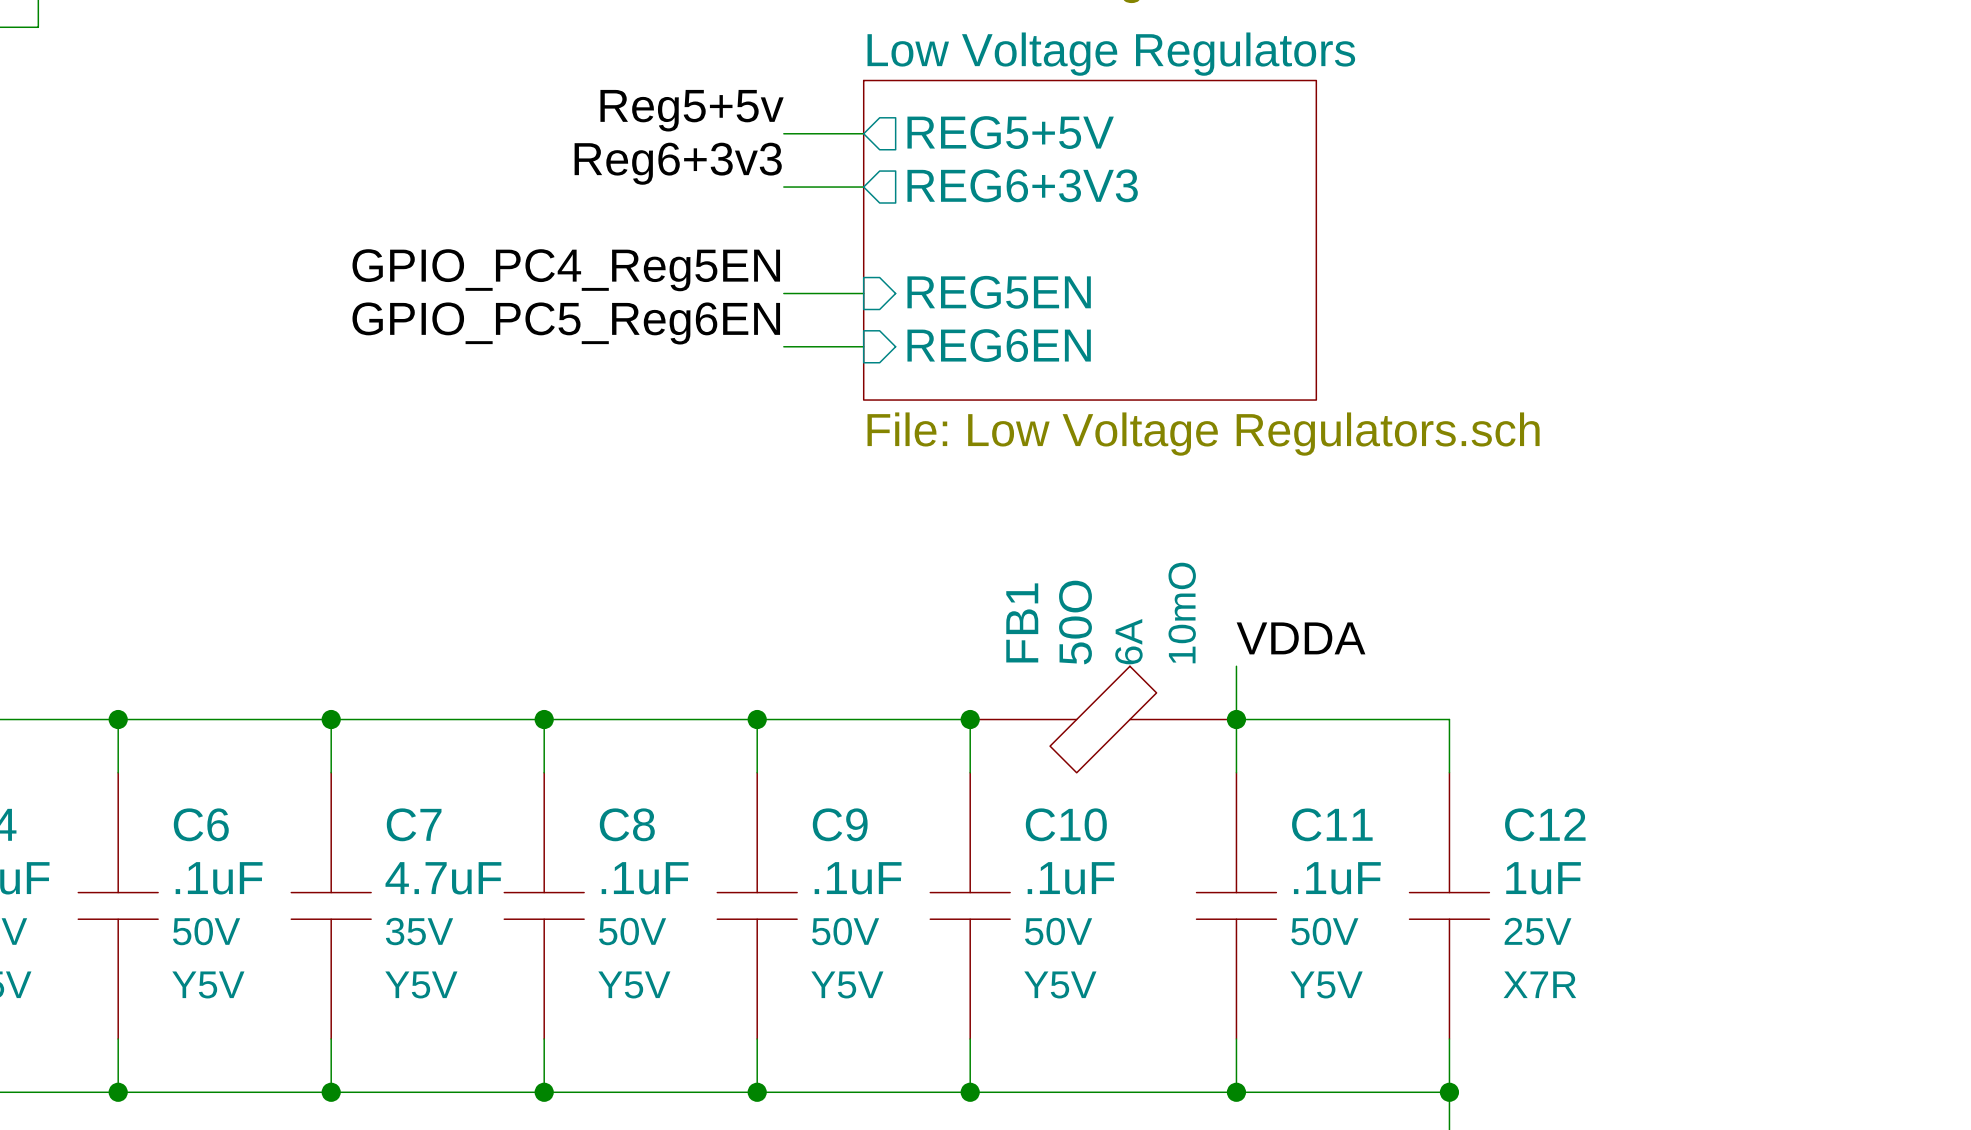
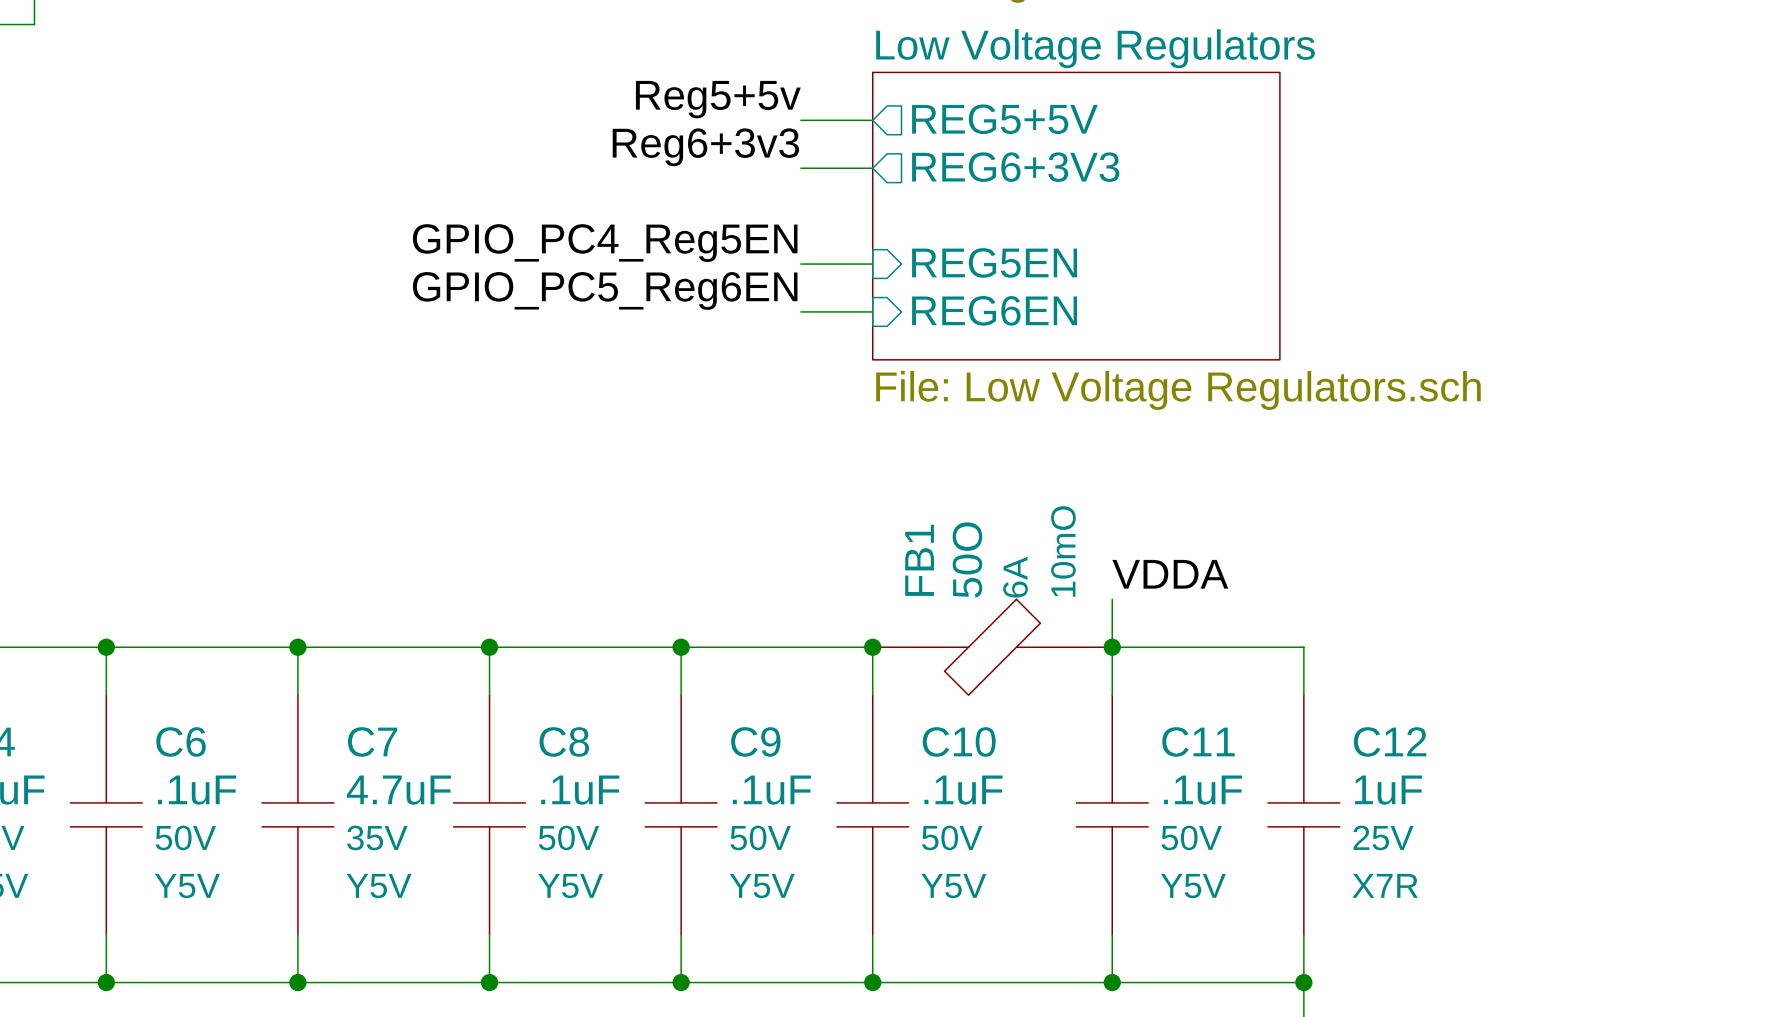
label position: Reg5+5v (692, 110) -> Reg5+5v (718, 99)
sheet pin position: REG5+5V (1010, 132) -> REG5+5V (1004, 119)
wire: (783, 133) (863, 133) -> (800, 120) (872, 120)
label position: Reg6+3v3 (678, 163) -> Reg6+3v3 (705, 147)
sheet pin position: REG6+3V3 (1022, 185) -> REG6+3V3 (1015, 167)
wire: (783, 187) (863, 187) -> (800, 168) (872, 168)
sheet Low Voltage Regulators position: (1090, 240) -> (1076, 216)
label position: GPIO_PC4_Reg5EN (566, 270) -> GPIO_PC4_Reg5EN (605, 243)
sheet pin position: REG5EN (999, 292) -> REG5EN (994, 262)
wire: (783, 293) (863, 293) -> (800, 264) (872, 264)
label position: GPIO_PC5_Reg6EN (566, 323) -> GPIO_PC5_Reg6EN (605, 290)
sheet pin position: REG6EN (999, 345) -> REG6EN (994, 310)
wire: (783, 346) (863, 346) -> (800, 311) (872, 311)

